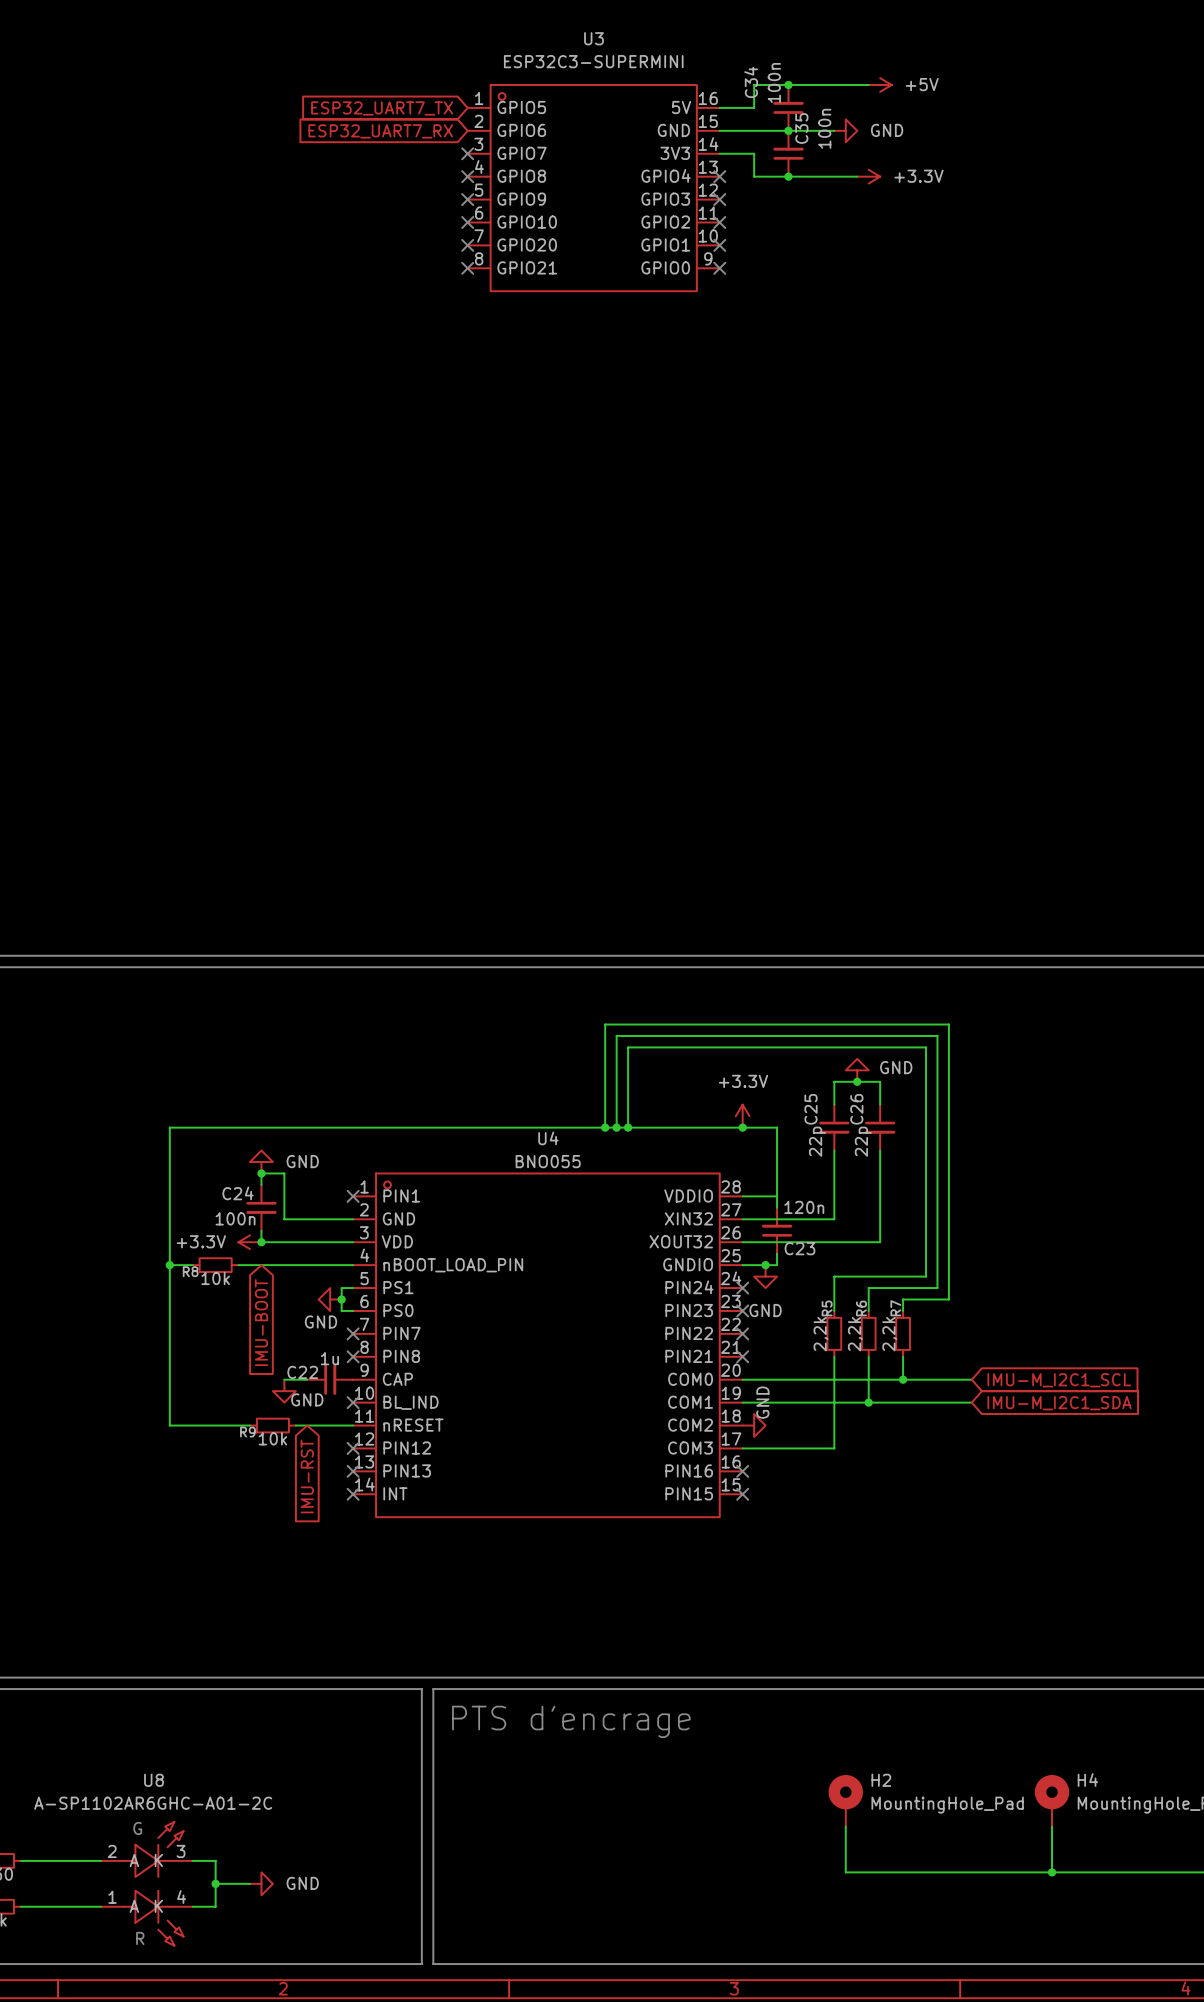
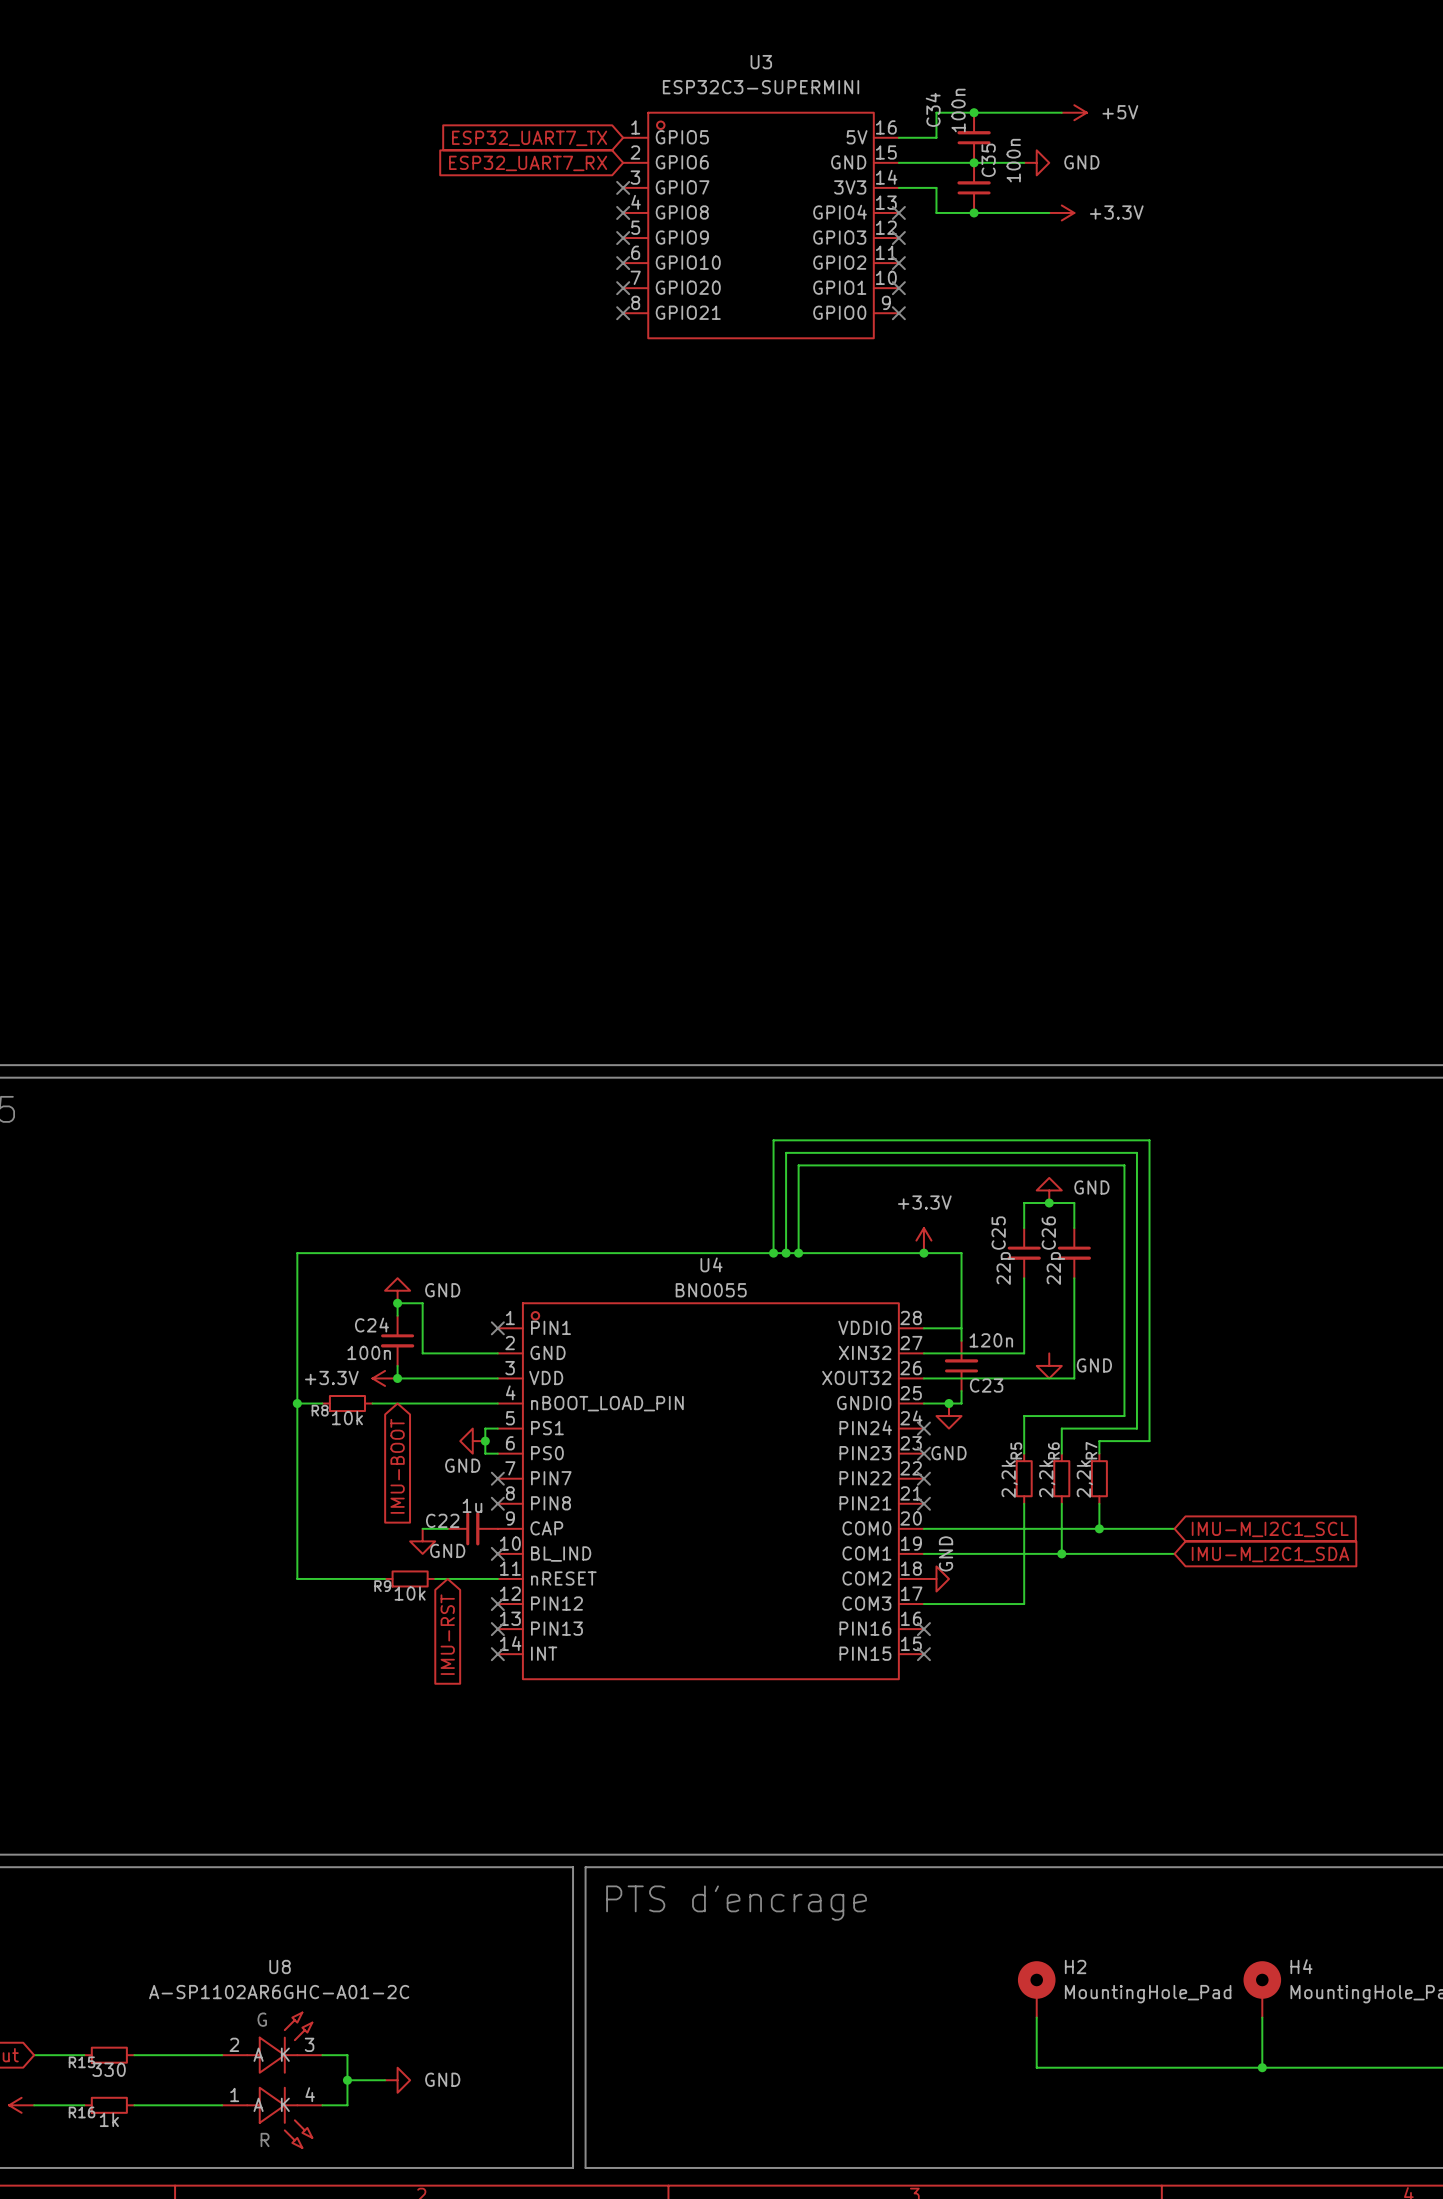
power symbol: none -> GND (1049, 1365)

